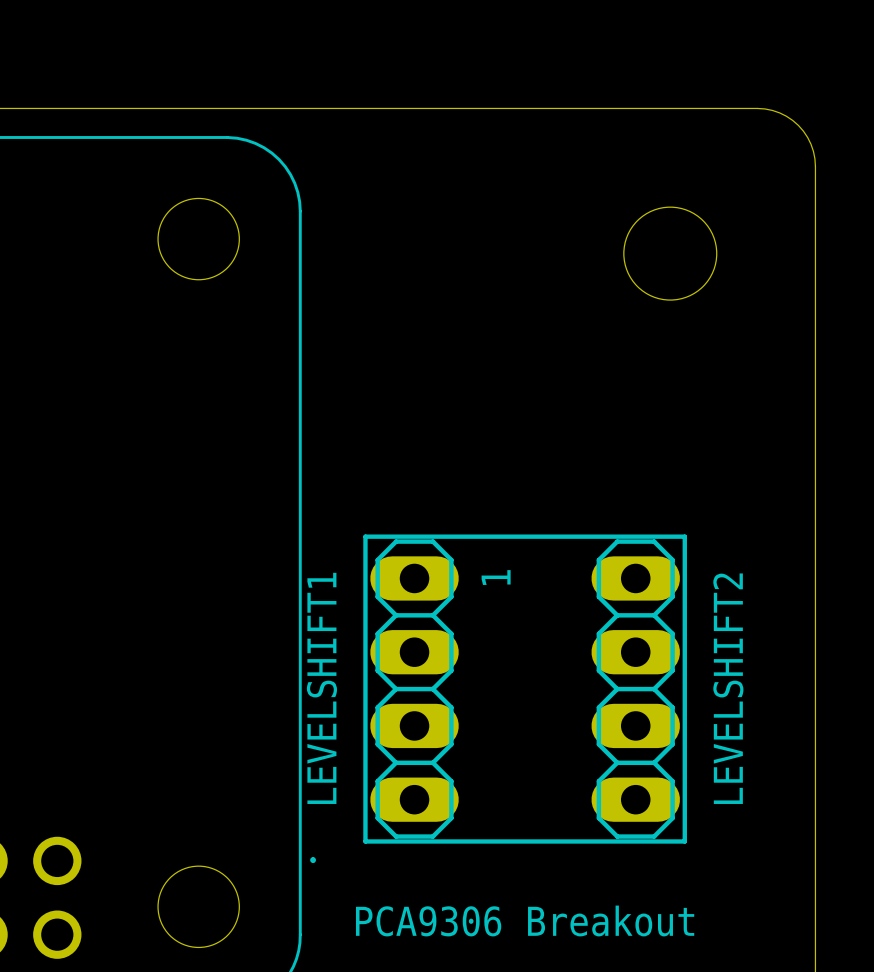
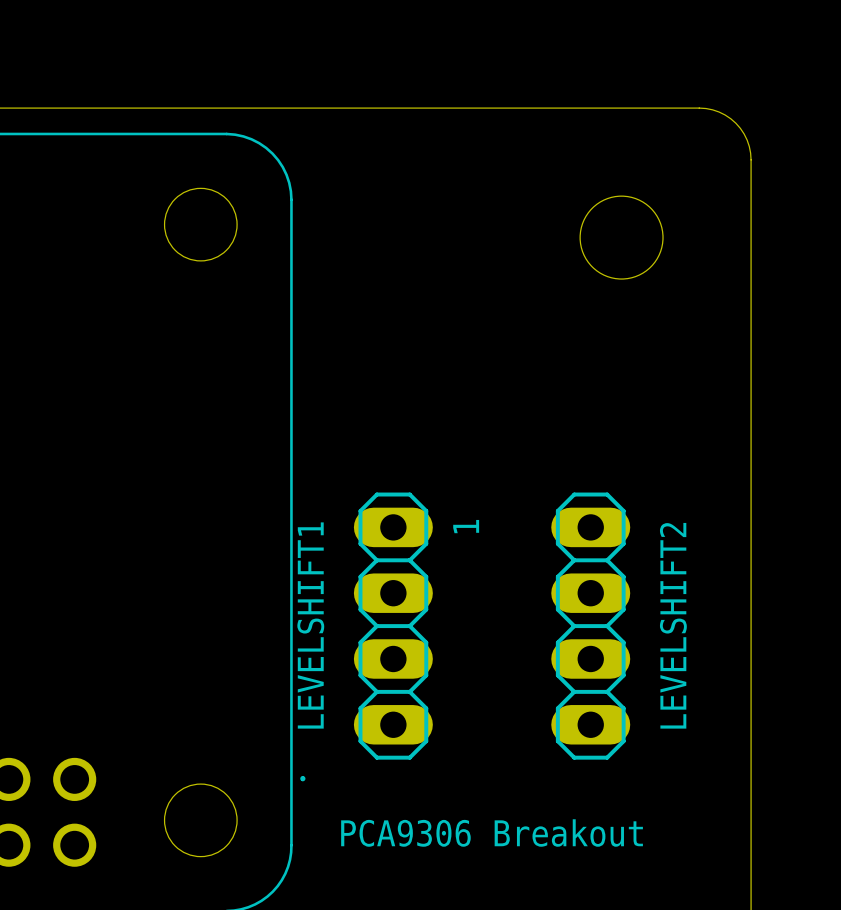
line: (365, 536) (684, 536) (684, 841) (365, 841) (365, 536) -> none

